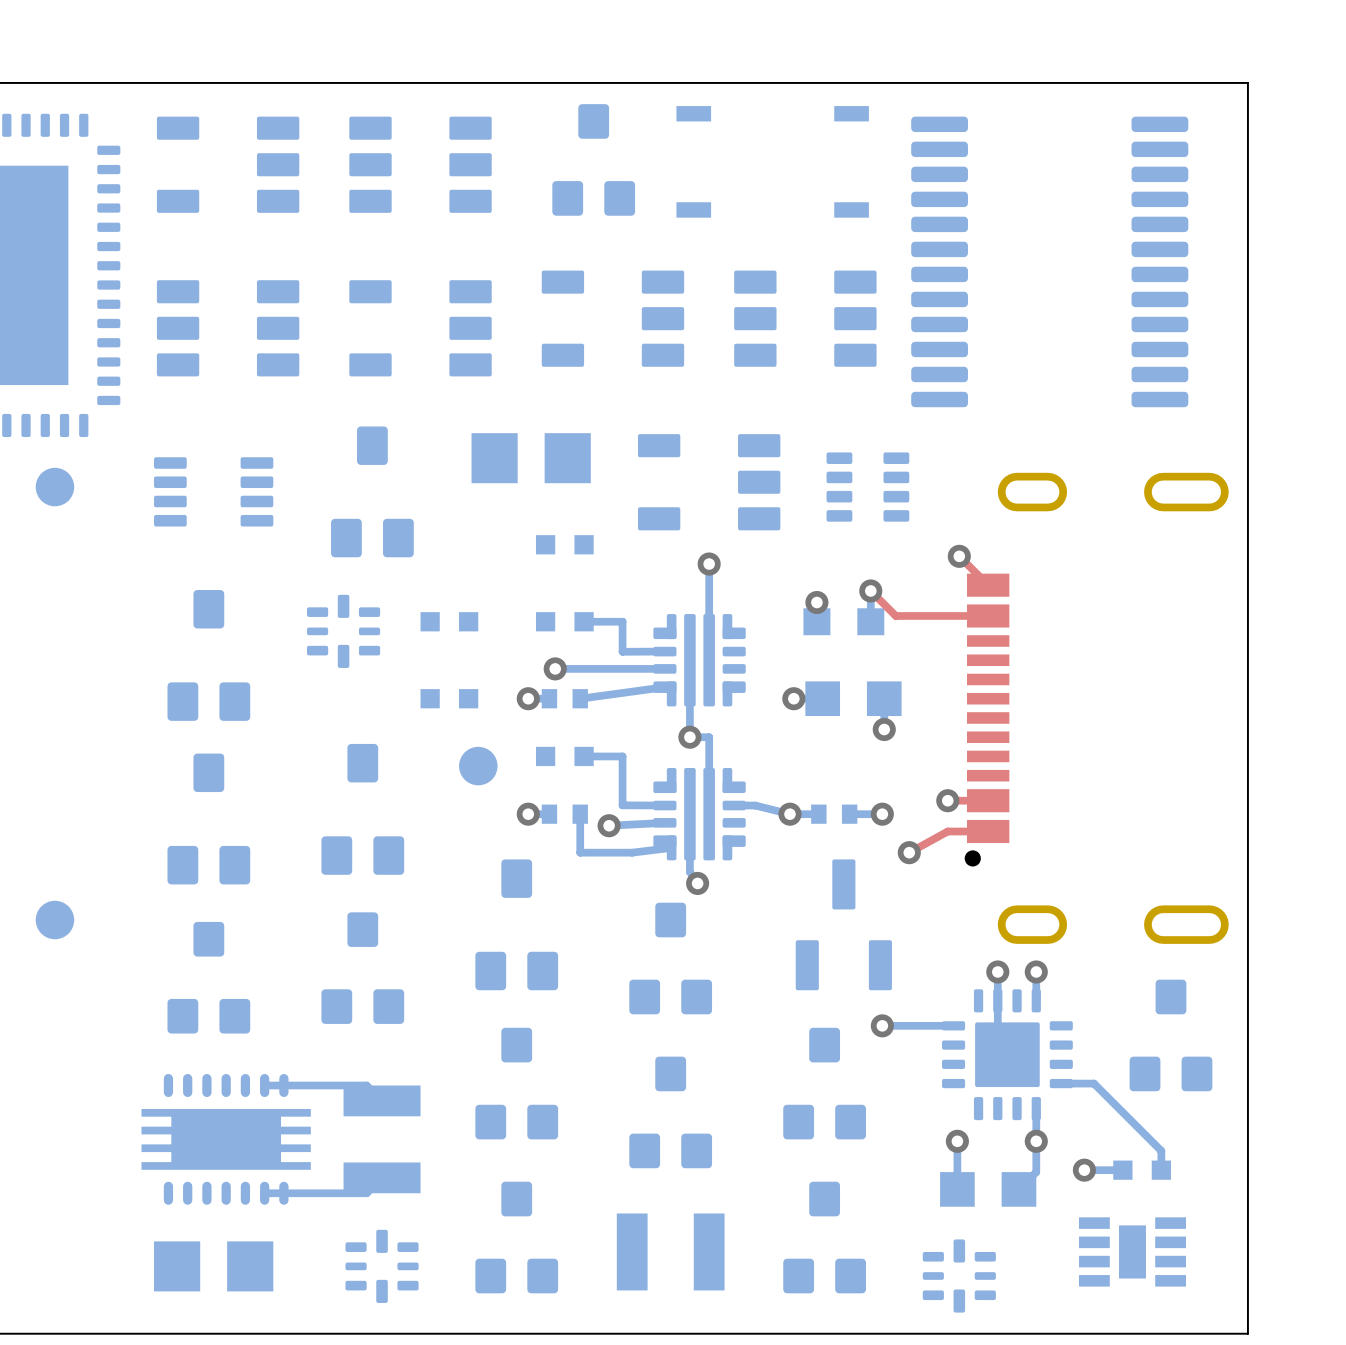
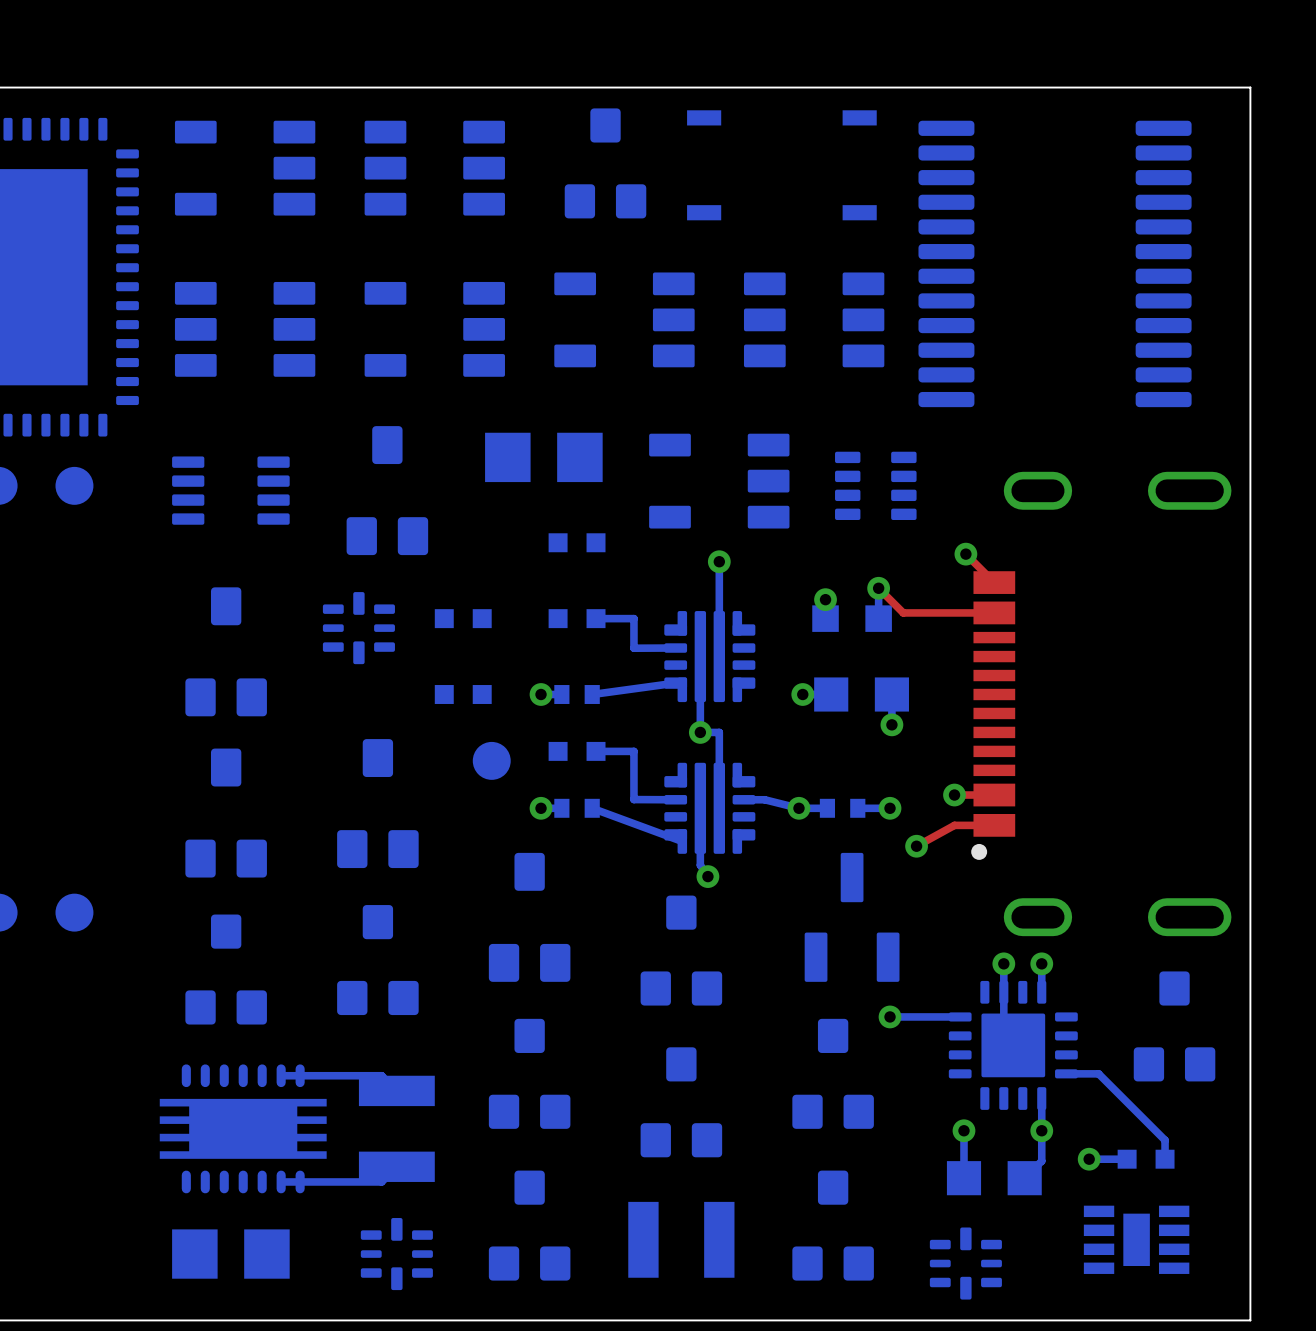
bottom track: (555, 668) (664, 668) -> none
via: (555, 668) -> none
bottom track: (580, 814) (580, 852) (632, 852) (671, 847) -> (592, 808) (682, 841)
bottom track: (664, 822) (609, 825) -> none
via: (609, 825) -> none

